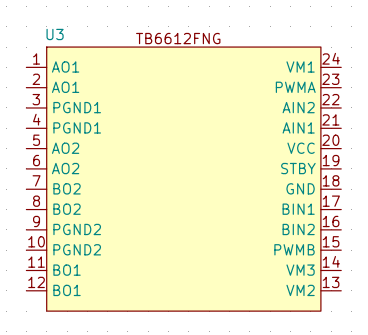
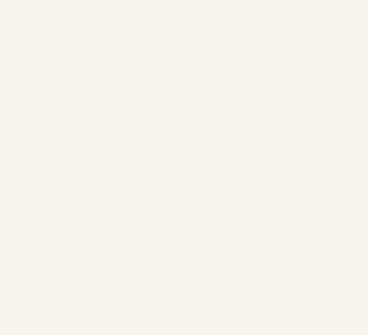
U3: (183, 179) -> none

